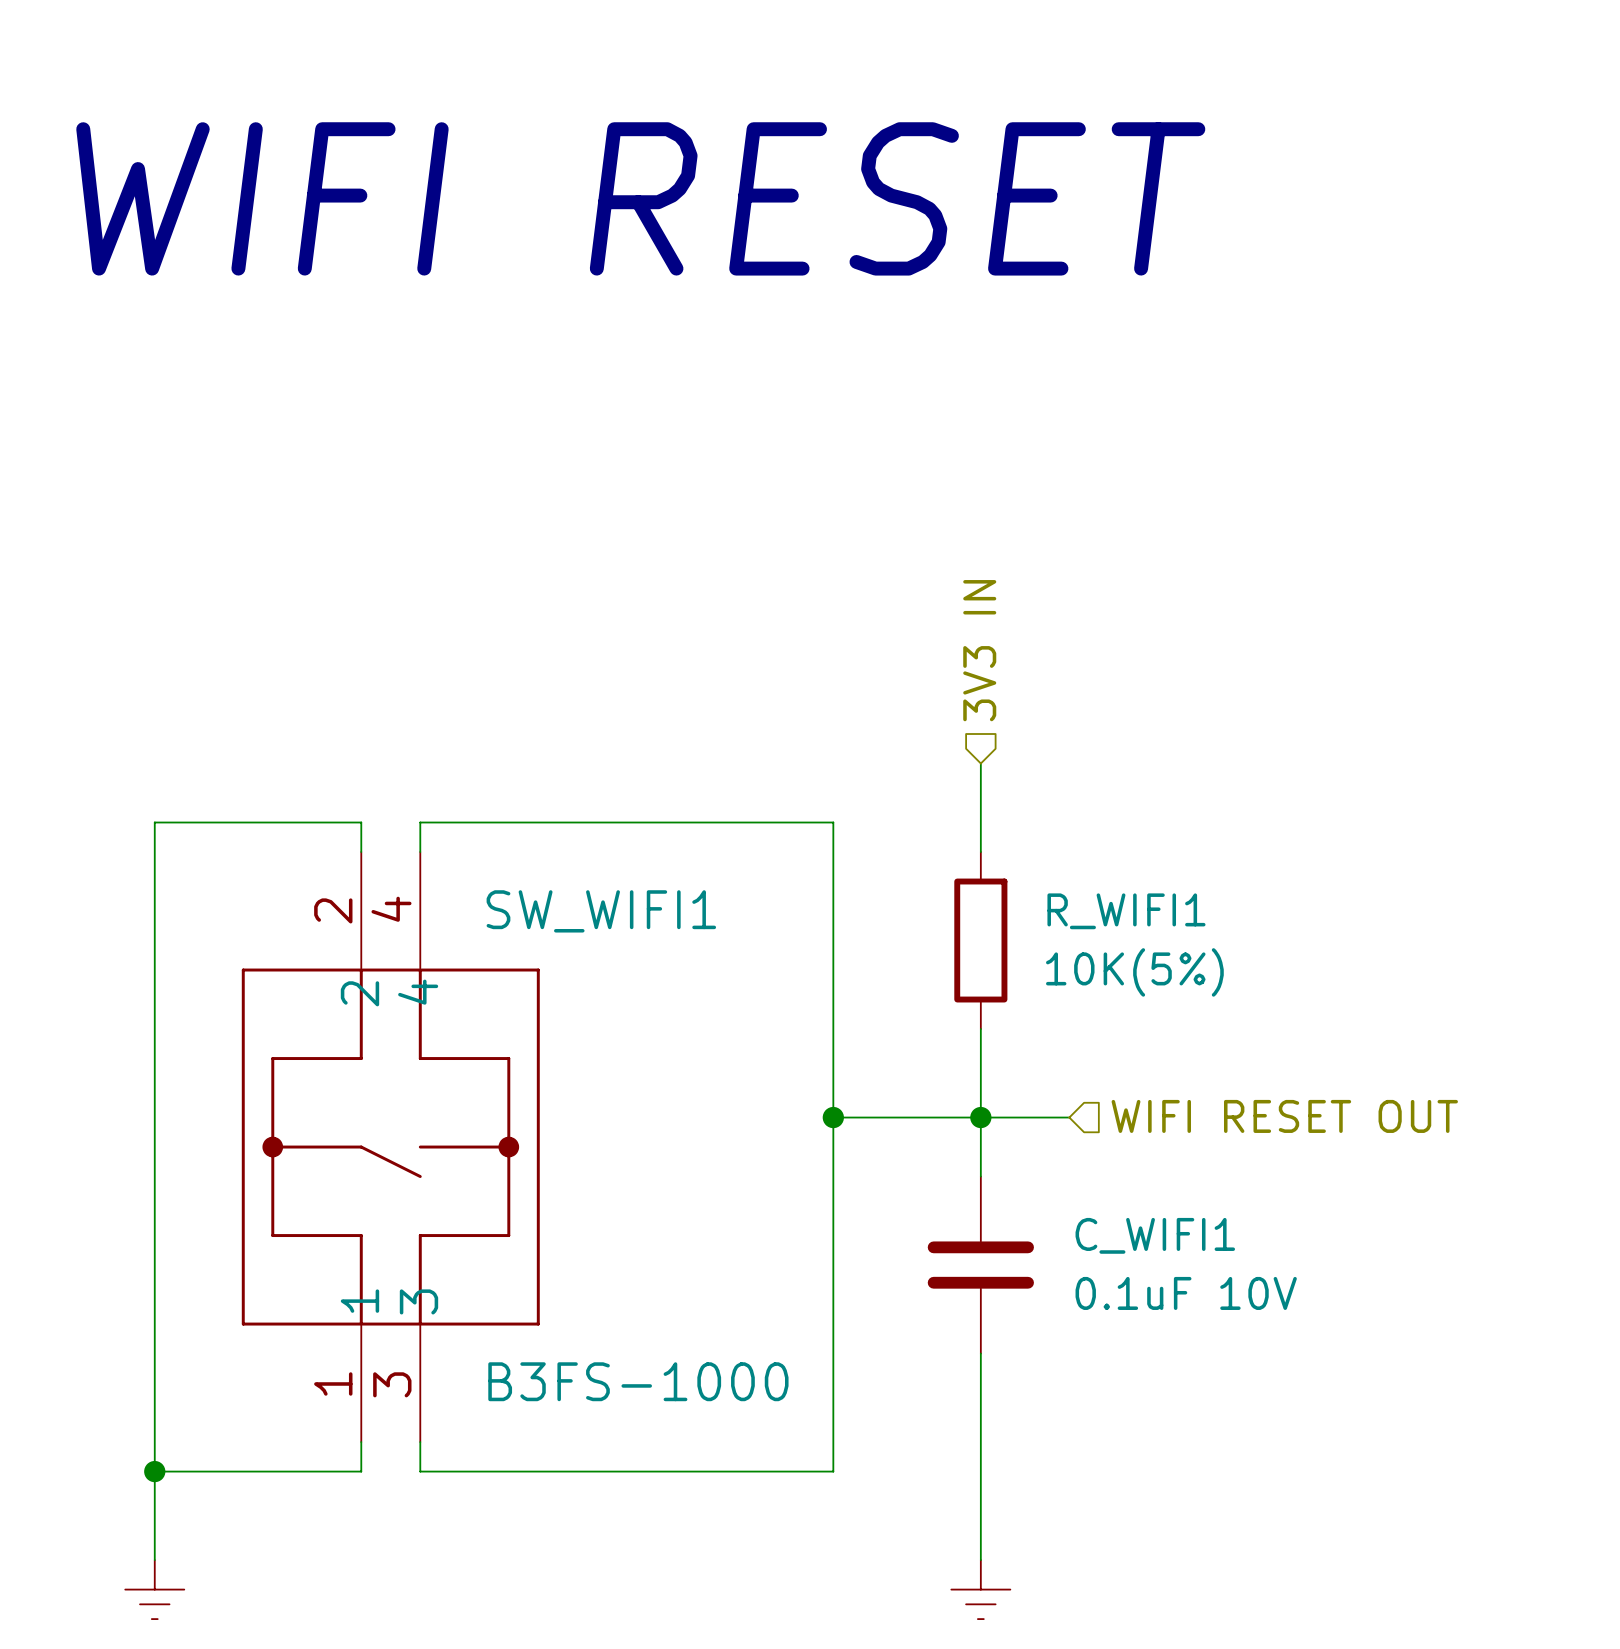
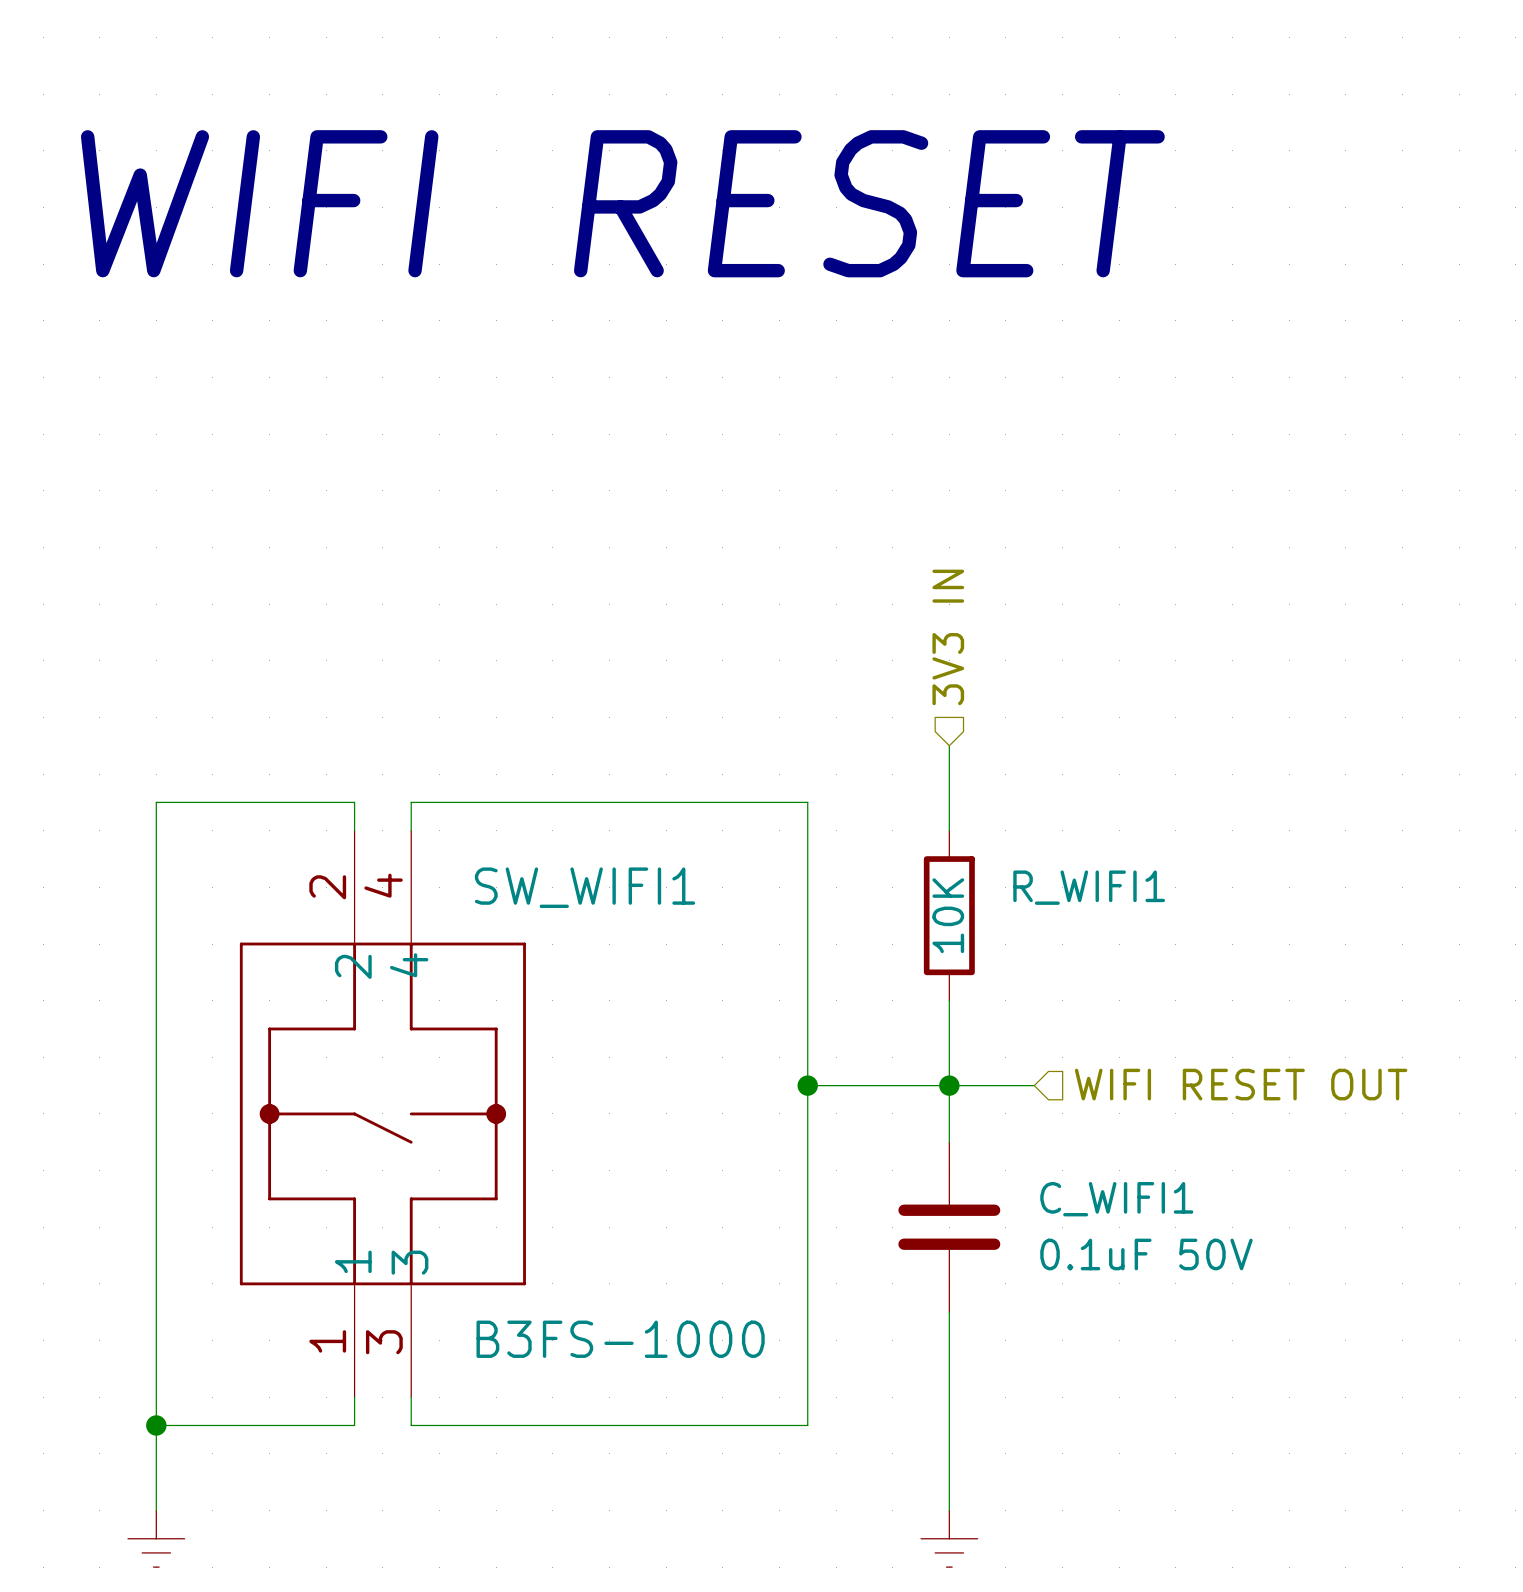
R_WIFI1 value: 10K(5%) (1134, 972) -> 10K (948, 915)
C_WIFI1 value: 0.1uF 10V (1186, 1293) -> 0.1uF 50V (1146, 1254)

